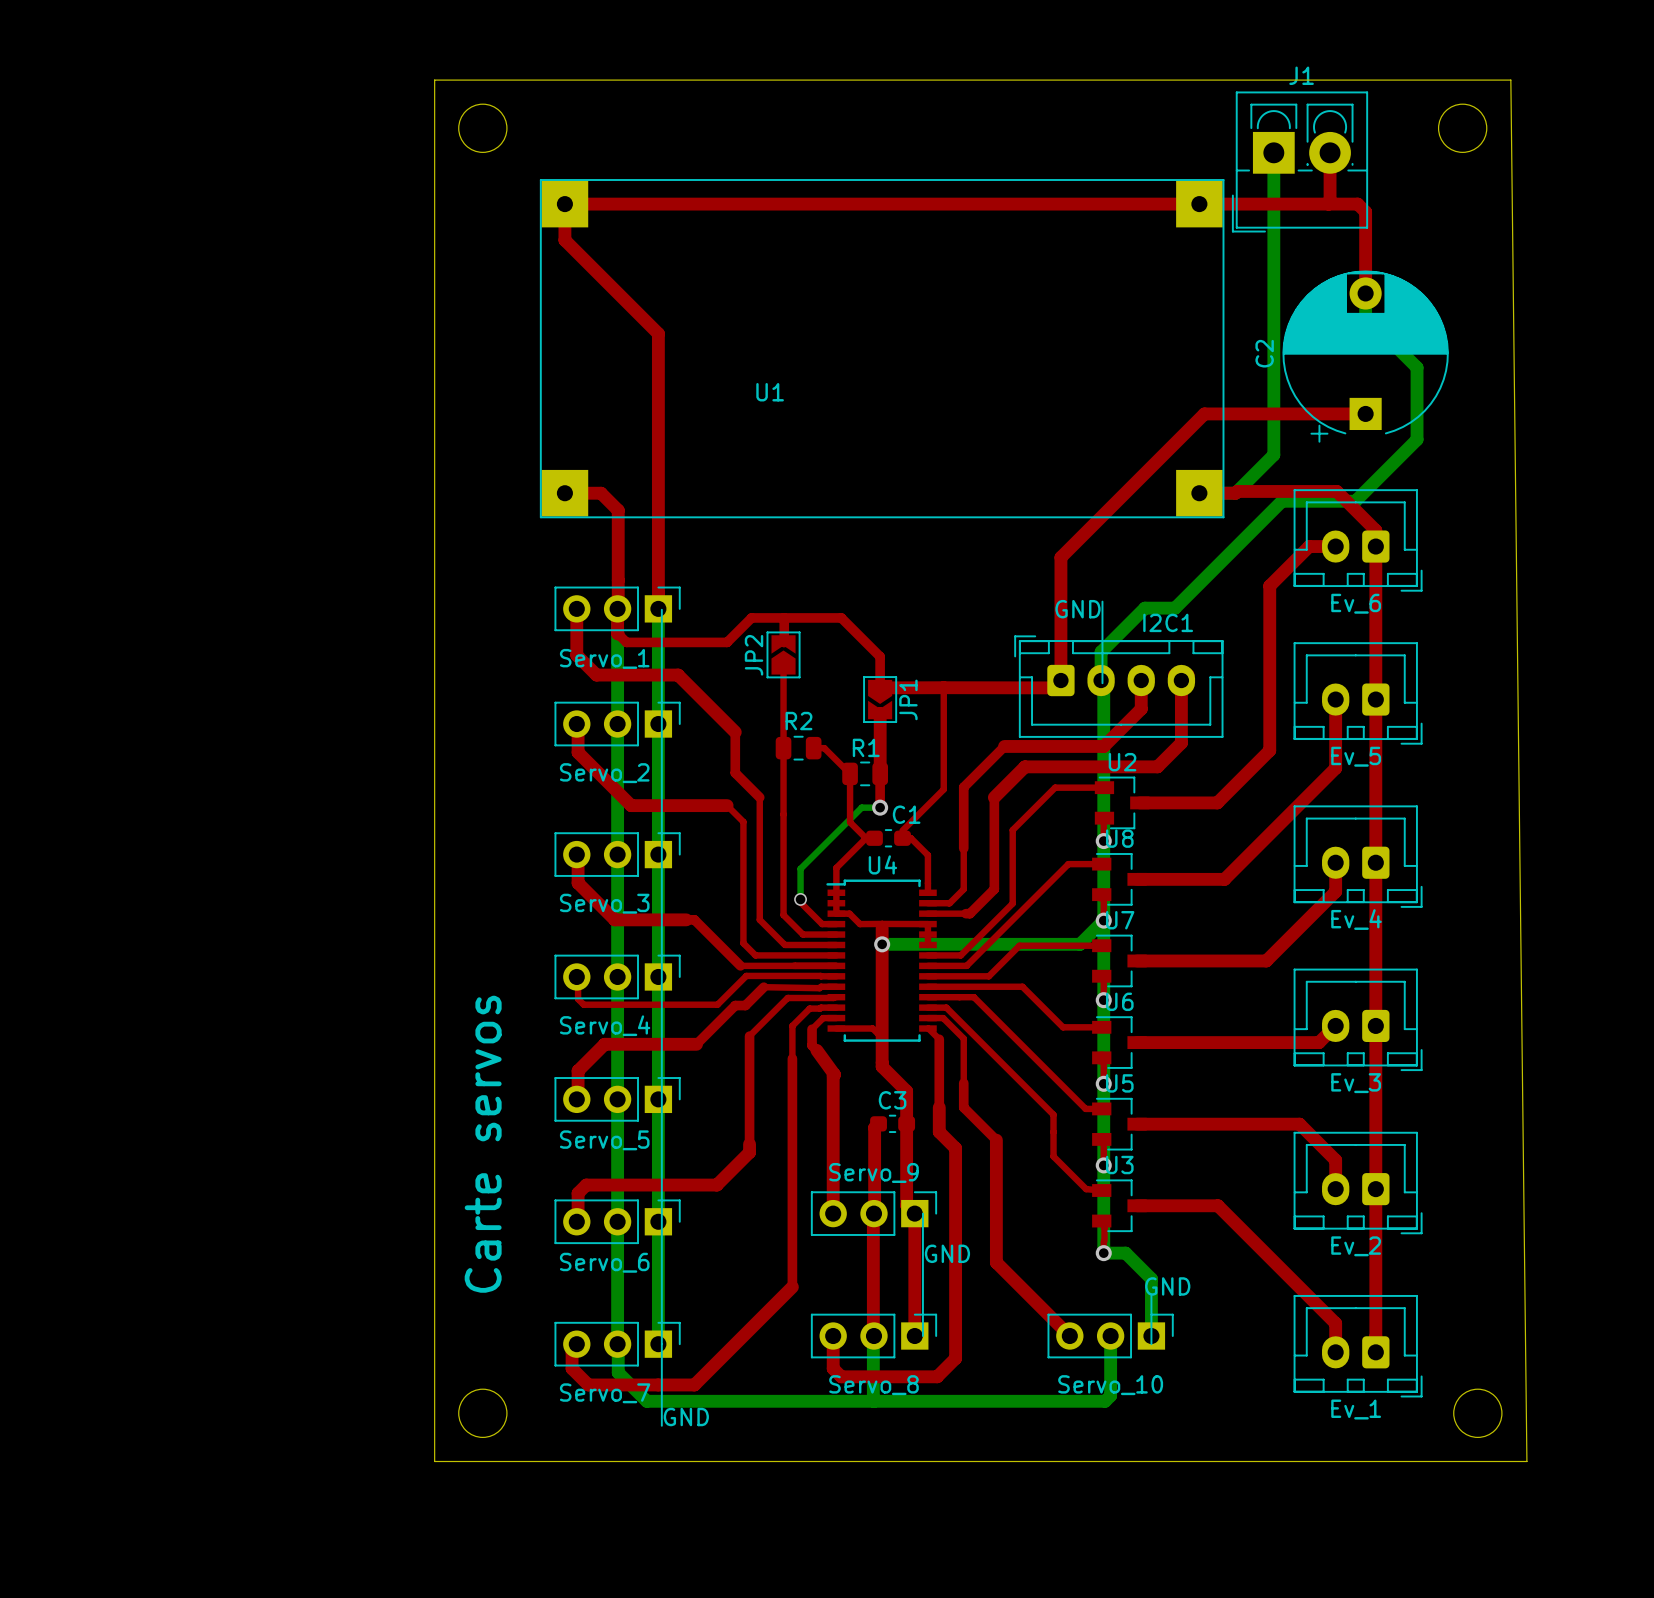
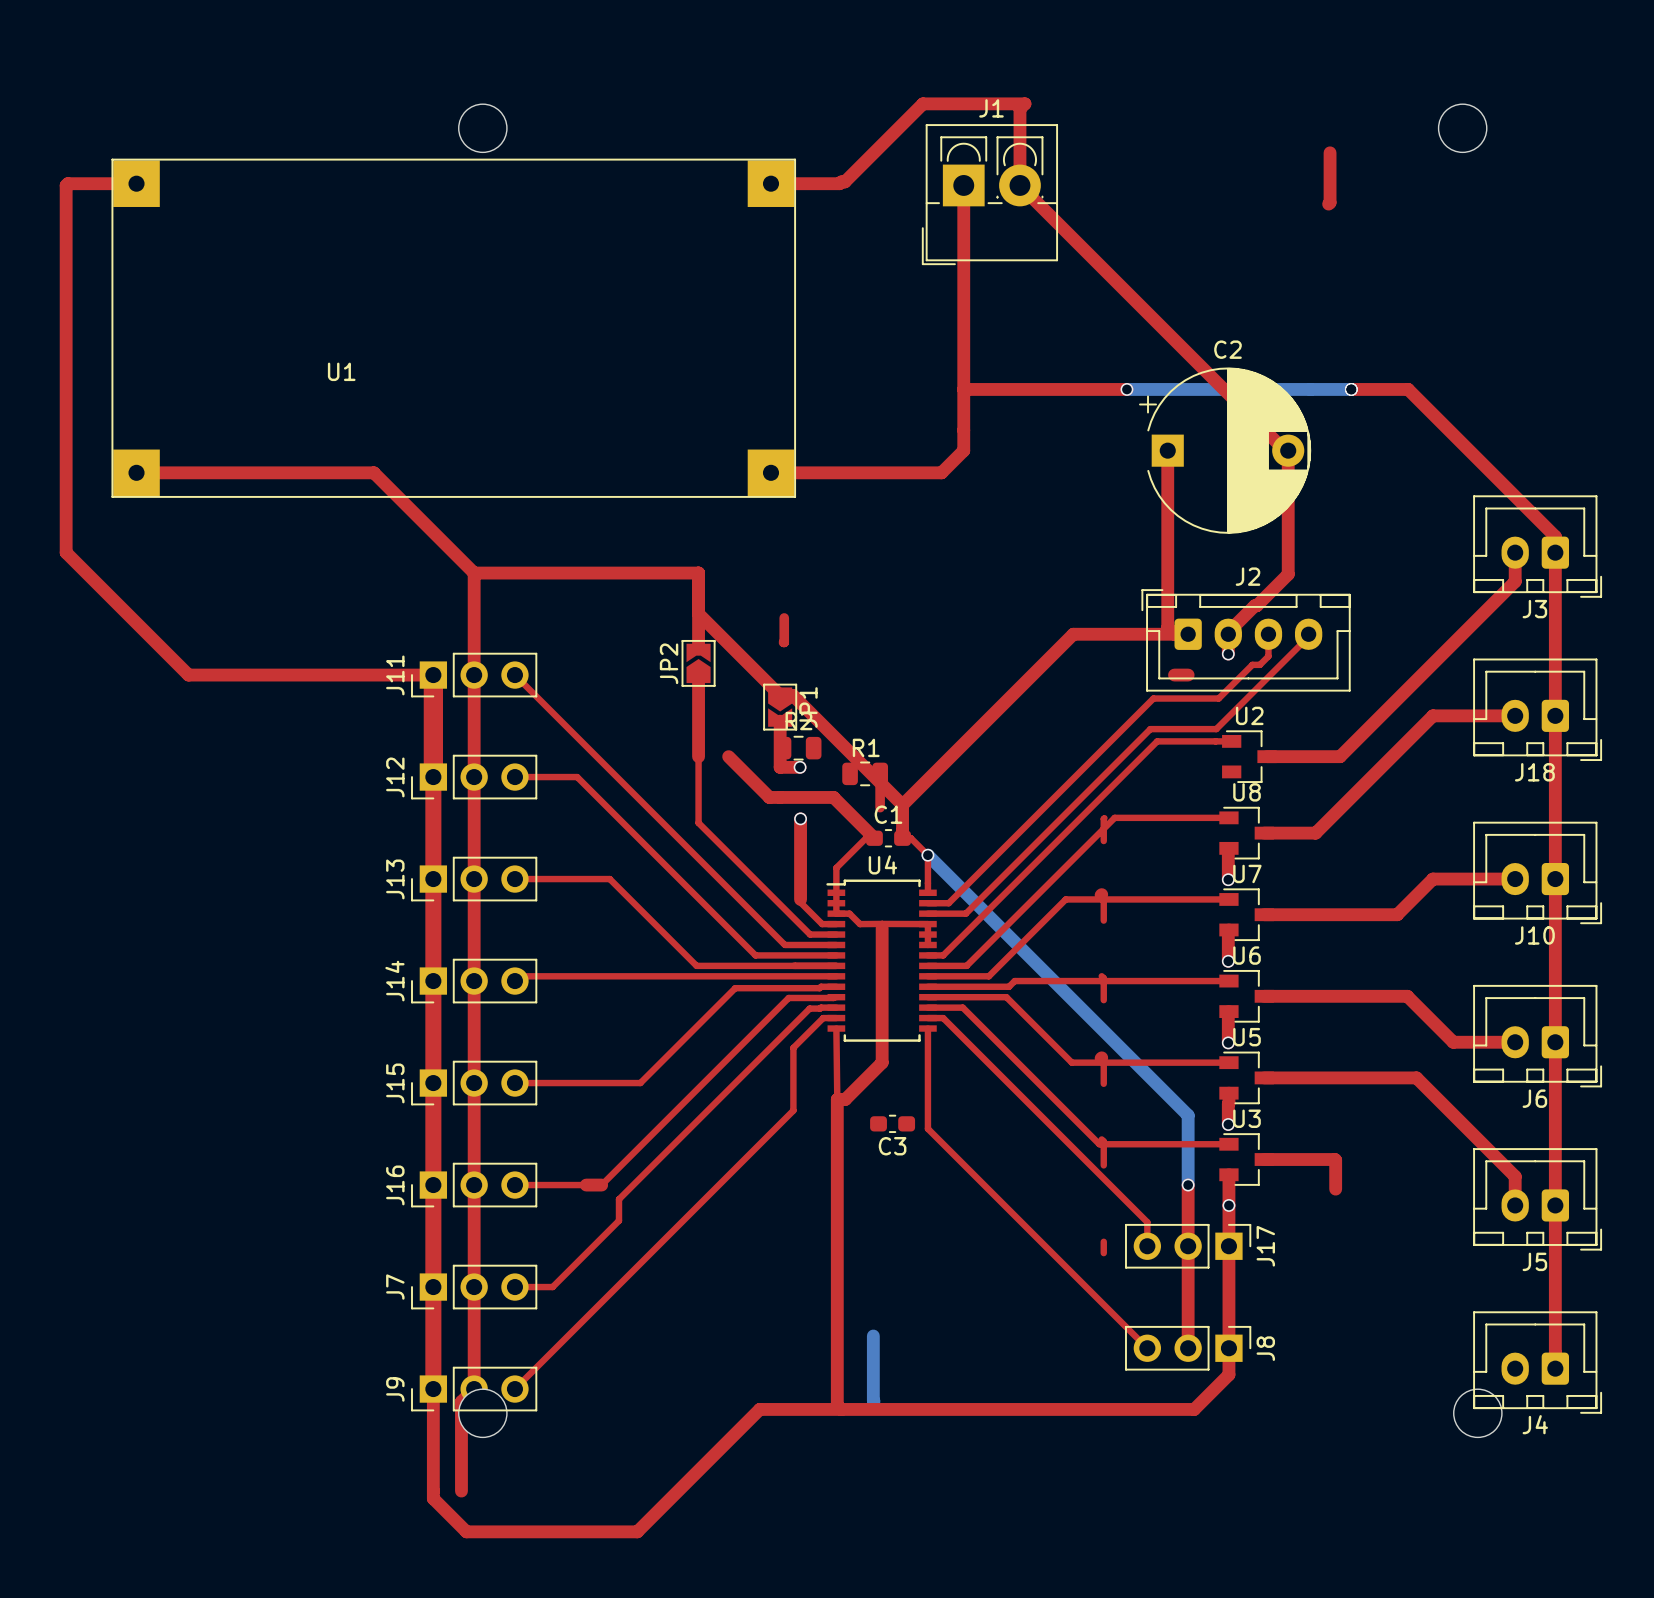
board edge: (434, 80) (434, 1461) (1526, 1461) (1510, 80) (434, 80) -> none
bottom track: (1273, 152) (1273, 454) (1235, 493) (1199, 493) -> none
J1 position: (1300, 161) -> (989, 194)
top track: none -> (136, 183) (67, 183) (66, 185) (66, 552) (188, 675) (433, 675) (433, 1498) (466, 1531) (637, 1531) (759, 1409) (1194, 1409) (1228, 1374) (1228, 1174)
top track: none -> (771, 183) (839, 183) (844, 181) (922, 103) (1024, 103) (1019, 108) (1019, 185) (1285, 450) (1288, 450) (1288, 574) (1228, 632) (1228, 654)
top track: none -> (963, 185) (963, 450) (941, 472) (771, 472)
top track: (1365, 293) (1365, 211) (1357, 204) (564, 204) (564, 240) (658, 333) (658, 608) -> none
bottom track: (1365, 293) (1365, 316) (1417, 367) (1417, 439) (1355, 501) (1281, 501) (1175, 608) (1144, 608) (1101, 652) (1101, 680) (1103, 683) (1103, 1253) (1125, 1253) (1151, 1278) (1151, 1336) -> none
U1 position: (882, 348) -> (453, 328)
C2 rotation: 0° (1365, 356) -> 90° clockwise (1225, 450)
C2 position: (1365, 356) -> (1225, 450)
top track: none -> (963, 389) (1126, 389)
bottom track: none -> (1126, 389) (1351, 389)
via: none -> (1126, 389)
top track: none -> (1351, 389) (1408, 389) (1555, 536) (1555, 1368)
via: none -> (1351, 389)
top track: (1365, 413) (1204, 413) (1060, 557) (1060, 680) (1053, 687) (943, 687) -> none
top track: none -> (1167, 450) (1167, 627) (1174, 634)
top track: none -> (136, 472) (373, 472) (474, 573)
top track: (564, 493) (601, 493) (618, 510) (618, 608) -> none
top track: (1199, 493) (1336, 491) (1375, 530) (1375, 1352) -> none
Ev_6: (1358, 540) -> none
top track: (1335, 546) (1309, 546) (1269, 585) (1269, 750) (1217, 802) (1139, 802) -> none
J3: none -> (1537, 546)
top track: none -> (1515, 552) (1515, 581) (1340, 756) (1267, 756)
top track: none -> (474, 573) (474, 1389) (461, 1401) (461, 1491)
top track: none -> (474, 573) (698, 573) (698, 649)
line: (1102, 601) (1102, 683) -> none
top track: (576, 608) (576, 655) (596, 675) (678, 675) (735, 732) (735, 772) (759, 797) (759, 919) -> (514, 675) (759, 919)
top track: (617, 608) (617, 633) (626, 642) (727, 642) (751, 617) (841, 617) (880, 656) (880, 687) (943, 687) -> none
bottom track: (617, 608) (617, 1344) -> none
Servo_1: (617, 608) -> none
bottom track: (658, 608) (658, 1344) -> none
line: (661, 609) (661, 1425) -> none
text: GND (1077, 609) -> none
top track: none -> (698, 613) (780, 695) (792, 695) (902, 805)
top track: none -> (1188, 634) (1073, 634) (902, 805)
J2: none -> (1246, 640)
JP2 position: (783, 654) -> (698, 663)
via: none -> (1228, 654)
top track: (783, 666) (783, 915) (803, 934) (810, 934) -> (698, 675) (698, 822) (810, 934)
J11: none -> (474, 675)
top track: (1141, 680) (1141, 709) (1103, 746) (1004, 746) (963, 787) (963, 848) -> none
top track: (1181, 682) (1181, 680) (1181, 743) (1157, 766) (1024, 766) (994, 797) (994, 889) (969, 913) (965, 913) -> (1308, 634) (1309, 636) (1216, 729) (1150, 729) (965, 913)
I2C1: (1118, 686) -> none
top track: (943, 687) (943, 789) (902, 830) -> none
Ev_5: (1358, 693) -> none
JP1 position: (880, 699) -> (780, 707)
top track: (1335, 699) (1335, 768) (1224, 879) (1137, 879) -> none
J18: none -> (1537, 709)
top track: (880, 713) (880, 773) -> none
top track: none -> (1515, 715) (1432, 715) (1315, 833) (1264, 833)
top track: none -> (780, 721) (780, 767) (800, 767)
top track: (578, 724) (578, 752) (631, 805) (727, 805) (743, 821) (743, 943) -> (514, 777) (577, 777) (743, 943)
Servo_2: (617, 724) -> none
top track: (813, 748) (824, 748) (850, 773) (850, 822) (866, 838) -> none
top track: none -> (728, 756) (769, 797) (833, 797) (874, 838)
via: none -> (800, 767)
J12: none -> (474, 777)
top track: (1104, 787) (1055, 787) (1012, 830) (1012, 903) (960, 955) (943, 955) -> (1231, 741) (1157, 741) (943, 955)
U2 position: (1122, 802) -> (1249, 756)
top track: none -> (902, 805) (902, 838)
bottom track: (880, 807) (861, 807) (800, 868) (800, 899) -> none
via: (880, 807) -> none
C1 name position: C1 (906, 814) -> C1 (888, 814)
top track: (963, 817) (963, 889) (948, 903) -> (1268, 634) (1268, 656) (1259, 664) (1252, 664) (1218, 698) (1153, 698) (948, 903)
top track: none -> (800, 818) (800, 899)
via: none -> (800, 818)
via: (1103, 841) -> none
top track: none -> (1228, 848) (1228, 879)
top track: (578, 854) (578, 883) (614, 919) (694, 919) (740, 965) -> (514, 879) (609, 879) (696, 965) (740, 965)
Servo_3: (617, 854) -> none
bottom track: none -> (927, 855) (1188, 1115) (1188, 1185)
via: none -> (927, 855)
Ev_4: (1358, 856) -> none
top track: (1335, 862) (1335, 891) (1266, 960) (1137, 960) -> none
top track: (1068, 864) (1101, 864) -> (1068, 864) (1114, 817) (1228, 817)
J10: none -> (1537, 872)
J13: none -> (474, 879)
U8 position: (1119, 879) -> (1246, 833)
via: none -> (1228, 879)
top track: none -> (1515, 879) (1432, 879) (1397, 914) (1264, 914)
via: (800, 899) -> none
bottom track: (1103, 920) (1080, 944) (882, 944) -> none
via: (1103, 920) -> none
top track: none -> (1228, 929) (1228, 961)
via: (882, 944) -> none
top track: (1019, 945) (1101, 945) -> (1019, 945) (1065, 899) (1228, 899)
U7 position: (1119, 960) -> (1246, 914)
via: none -> (1228, 961)
Servo_4: (617, 976) -> none
top track: (821, 976) (746, 975) (717, 1004) (583, 1004) (578, 999) (578, 976) -> (821, 976) (519, 976) (514, 981)
J14: none -> (474, 981)
top track: (1009, 986) (1022, 986) (1063, 1027) (1101, 1027) -> (1009, 986) (1014, 981) (1228, 981)
top track: (819, 988) (763, 987) (745, 1005) (735, 1005) (696, 1044) (604, 1044) (578, 1070) (578, 1099) -> (819, 988) (735, 988) (640, 1083) (514, 1083)
top track: none -> (1264, 996) (1407, 996) (1453, 1042) (1515, 1042)
top track: (973, 997) (1085, 1108) (1101, 1108) -> (973, 997) (1006, 997) (1071, 1062) (1228, 1062)
top track: (788, 998) (749, 1036) (749, 1152) (716, 1185) (601, 1185) -> (788, 998) (601, 1185)
via: (1103, 1000) -> none
top track: (946, 1007) (1053, 1114) (1053, 1156) (1086, 1189) (1101, 1190) -> (946, 1007) (962, 1007) (1099, 1144) (1228, 1144)
top track: none -> (1228, 1011) (1228, 1042)
Ev_3: (1358, 1019) -> none
top track: (792, 1025) (792, 1287) (694, 1384) (588, 1384) (572, 1368) (572, 1352) (578, 1344) -> (792, 1025) (619, 1199) (619, 1220) (552, 1287) (514, 1287)
top track: (1335, 1025) (1319, 1042) (1137, 1042) -> none
top track: (836, 1028) (872, 1028) (881, 1034) -> (836, 1028) (837, 1099)
top track: (927, 1028) (939, 1039) (939, 1132) (955, 1148) (955, 1358) (937, 1376) (841, 1376) (833, 1368) (833, 1336) -> (927, 1028) (927, 1128) (1147, 1348)
top track: (812, 1029) (812, 1045) (834, 1074) (833, 1213) -> (812, 1029) (793, 1047) (793, 1110) (514, 1389)
J6: none -> (1537, 1036)
top track: (963, 1038) (963, 1107) (996, 1140) (996, 1262) (1069, 1336) -> (963, 1038) (1147, 1222) (1147, 1246)
U6 position: (1119, 1042) -> (1246, 996)
via: none -> (1228, 1042)
top track: (882, 1062) (882, 1066) (906, 1091) (906, 1205) (914, 1213) (914, 1336) -> (882, 1062) (845, 1099) (837, 1099)
top track: none -> (1264, 1077) (1416, 1077) (1515, 1176) (1515, 1205)
J15: none -> (474, 1083)
via: (1103, 1083) -> none
top track: none -> (1228, 1093) (1228, 1124)
Servo_5: (617, 1099) -> none
top track: none -> (837, 1099) (837, 1405) (841, 1409)
C3 name position: C3 (892, 1100) -> C3 (892, 1146)
top track: (878, 1123) (874, 1127) (873, 1336) -> none
U5 position: (1119, 1124) -> (1246, 1077)
top track: (1137, 1124) (1299, 1124) (1334, 1159) -> (1264, 1159) (1334, 1159)
via: none -> (1228, 1124)
text: Carte servos (483, 1144) -> none
via: (1103, 1165) -> none
Ev_2: (1358, 1183) -> none
J16: none -> (474, 1185)
top track: (586, 1185) (578, 1193) (578, 1221) -> (586, 1185) (514, 1185)
top track: none -> (1188, 1185) (1188, 1348)
via: none -> (1188, 1185)
J5: none -> (1537, 1199)
U3 position: (1119, 1205) -> (1246, 1159)
top track: (1137, 1205) (1218, 1205) (1335, 1323) (1335, 1352) -> none
via: none -> (1228, 1205)
Servo_9: (873, 1213) -> none
line: (922, 1213) (922, 1336) -> none
Servo_6: (617, 1221) -> none
top track: (1101, 1221) (1104, 1227) (1104, 1241) -> none
J17: none -> (1188, 1246)
text: GND (947, 1253) -> none
via: (1103, 1253) -> none
text: GND (1167, 1286) -> none
J7: none -> (474, 1287)
line: (1151, 1295) (1151, 1344) -> none
Servo_8: (873, 1336) -> none
bottom track: (1110, 1336) (1110, 1395) (1105, 1401) (646, 1401) (618, 1372) (618, 1344) -> none
Servo_10: (1110, 1336) -> none
Servo_7: (617, 1344) -> none
Ev_1: (1358, 1346) -> none
J8: none -> (1188, 1348)
J4: none -> (1537, 1362)
J9: none -> (474, 1389)
text: GND (686, 1417) -> none

